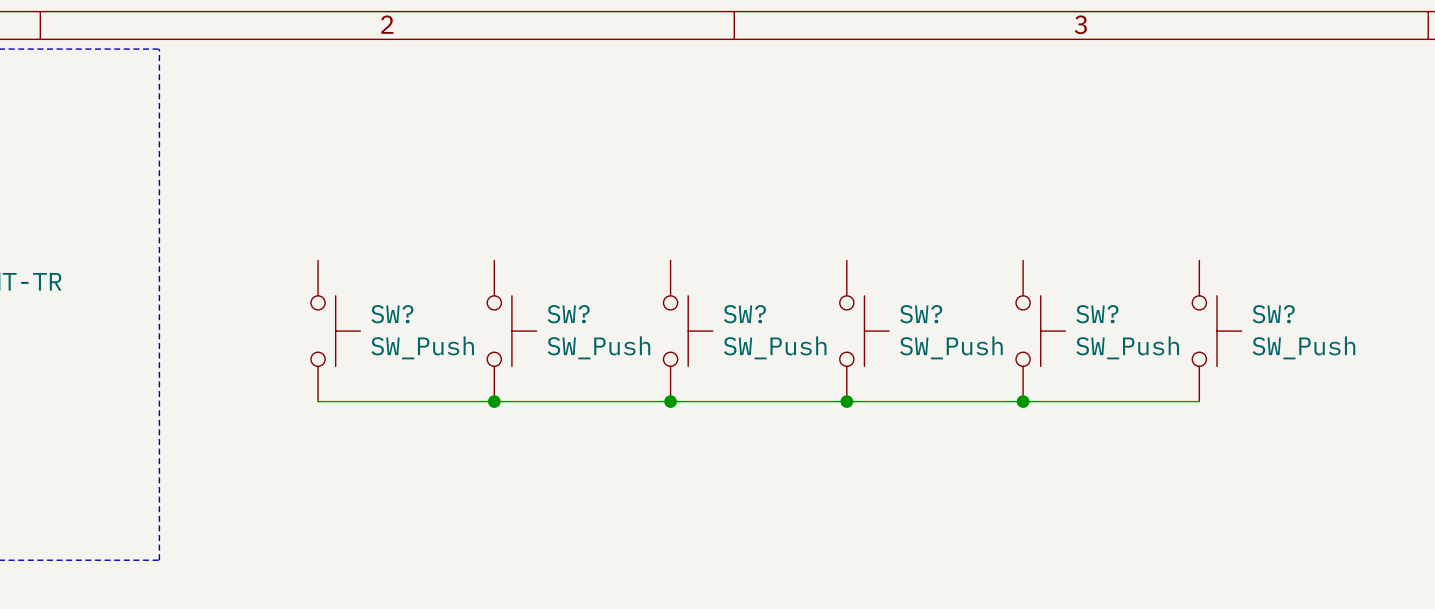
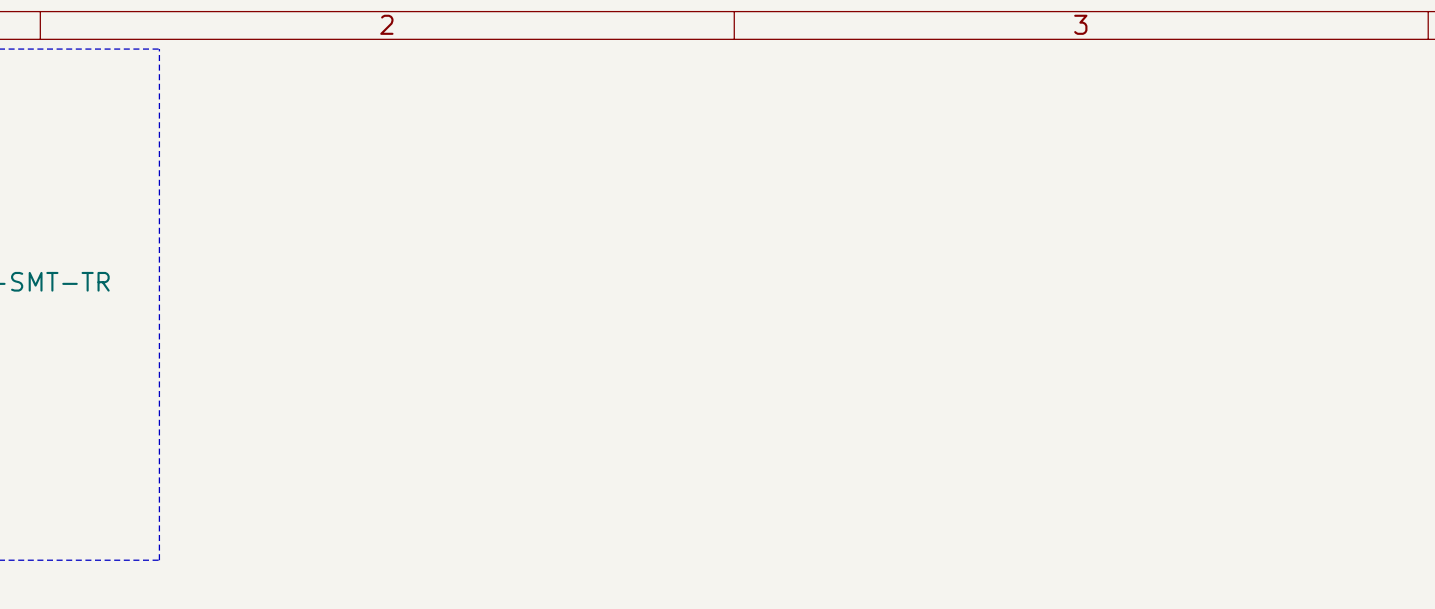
SW?: SW_Push (335, 331) -> none
SW?: SW_Push (511, 331) -> none
SW?: SW_Push (688, 331) -> none
SW?: SW_Push (864, 331) -> none
SW?: SW_Push (1040, 331) -> none
SW?: SW_Push (1216, 331) -> none
wire: (318, 401) (1199, 401) -> none
junction: (494, 401) -> none
junction: (670, 401) -> none
junction: (846, 401) -> none
junction: (1023, 401) -> none

